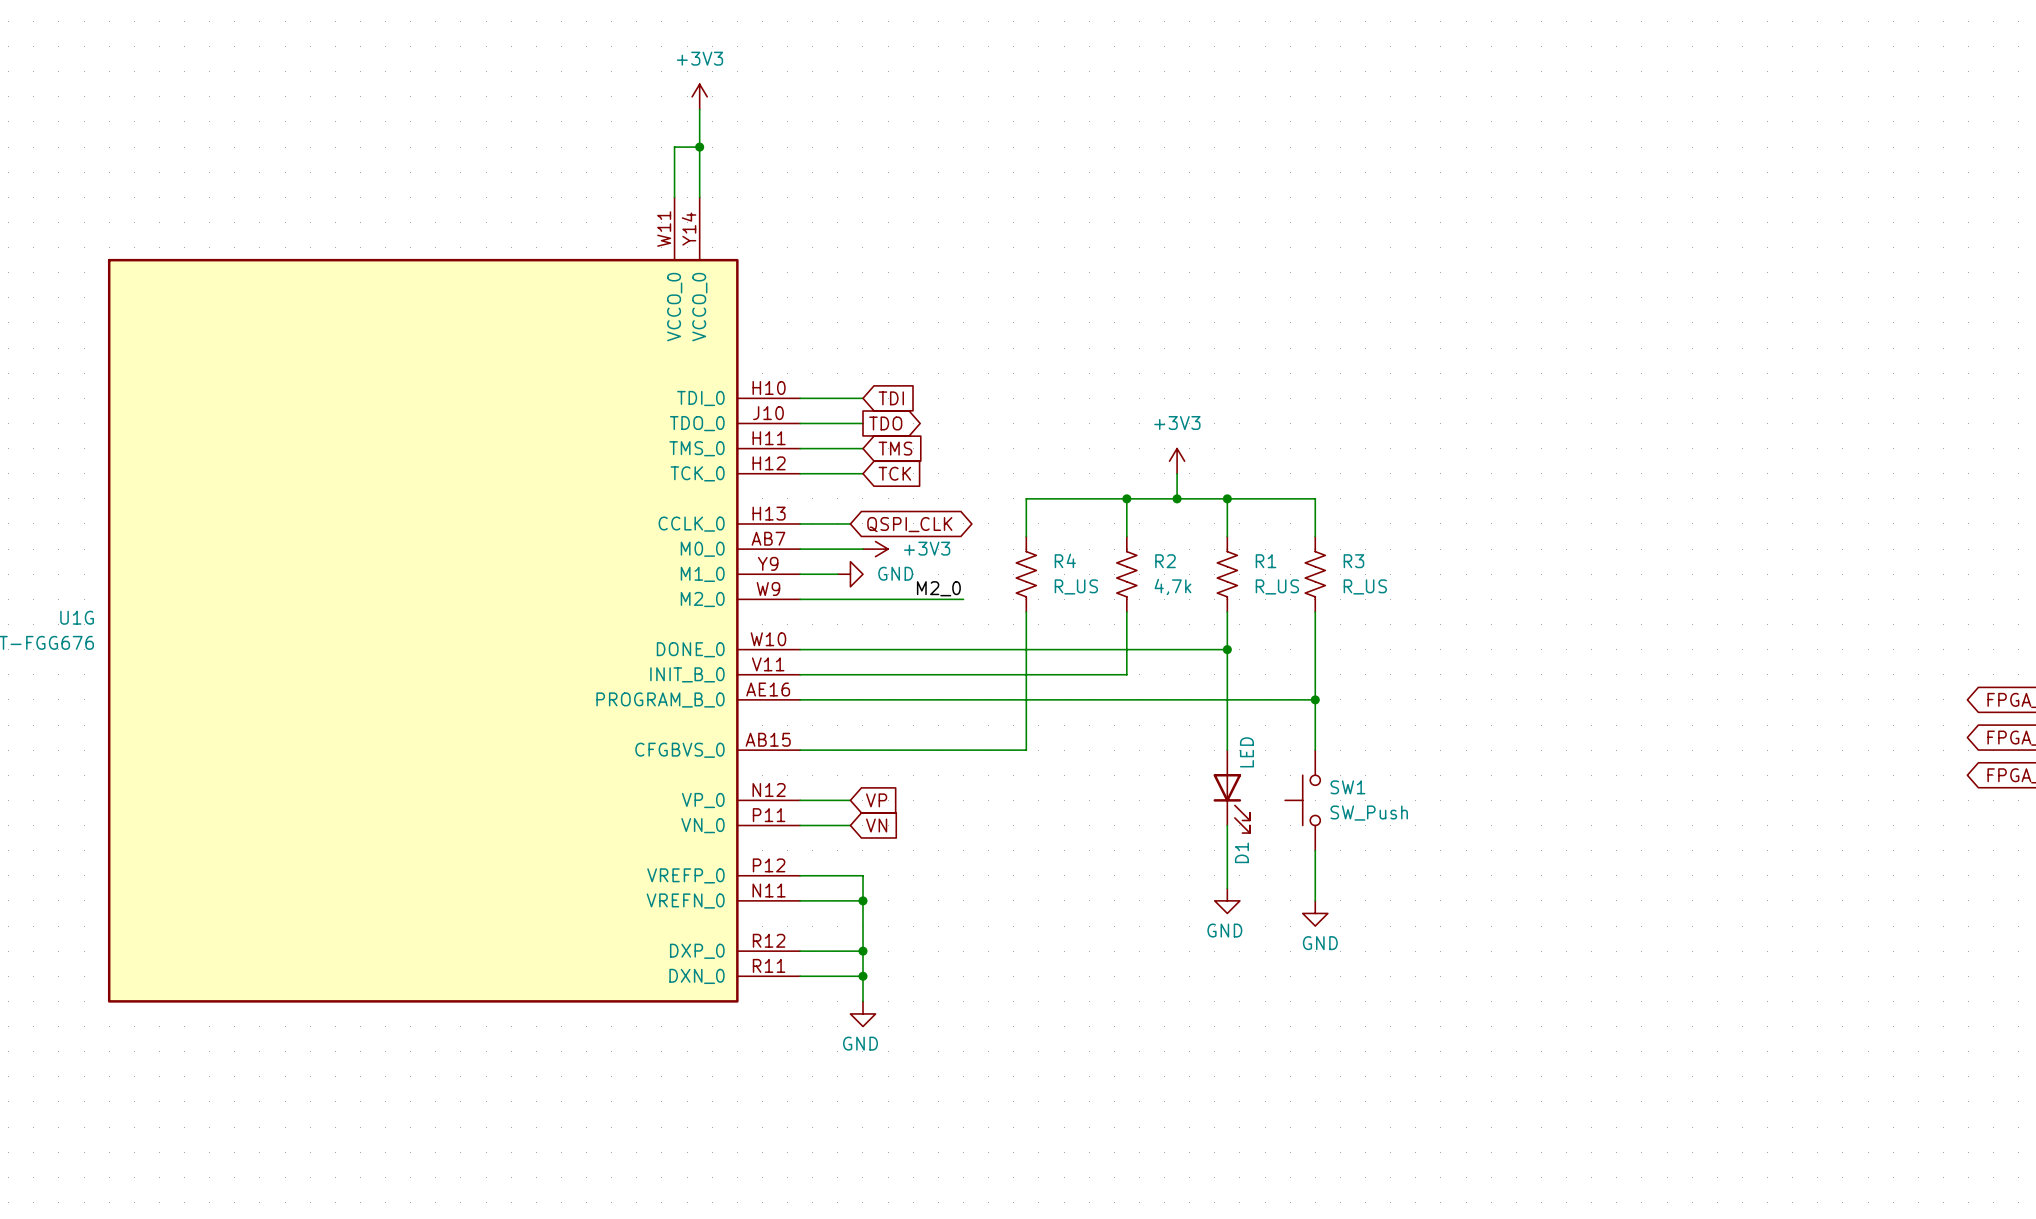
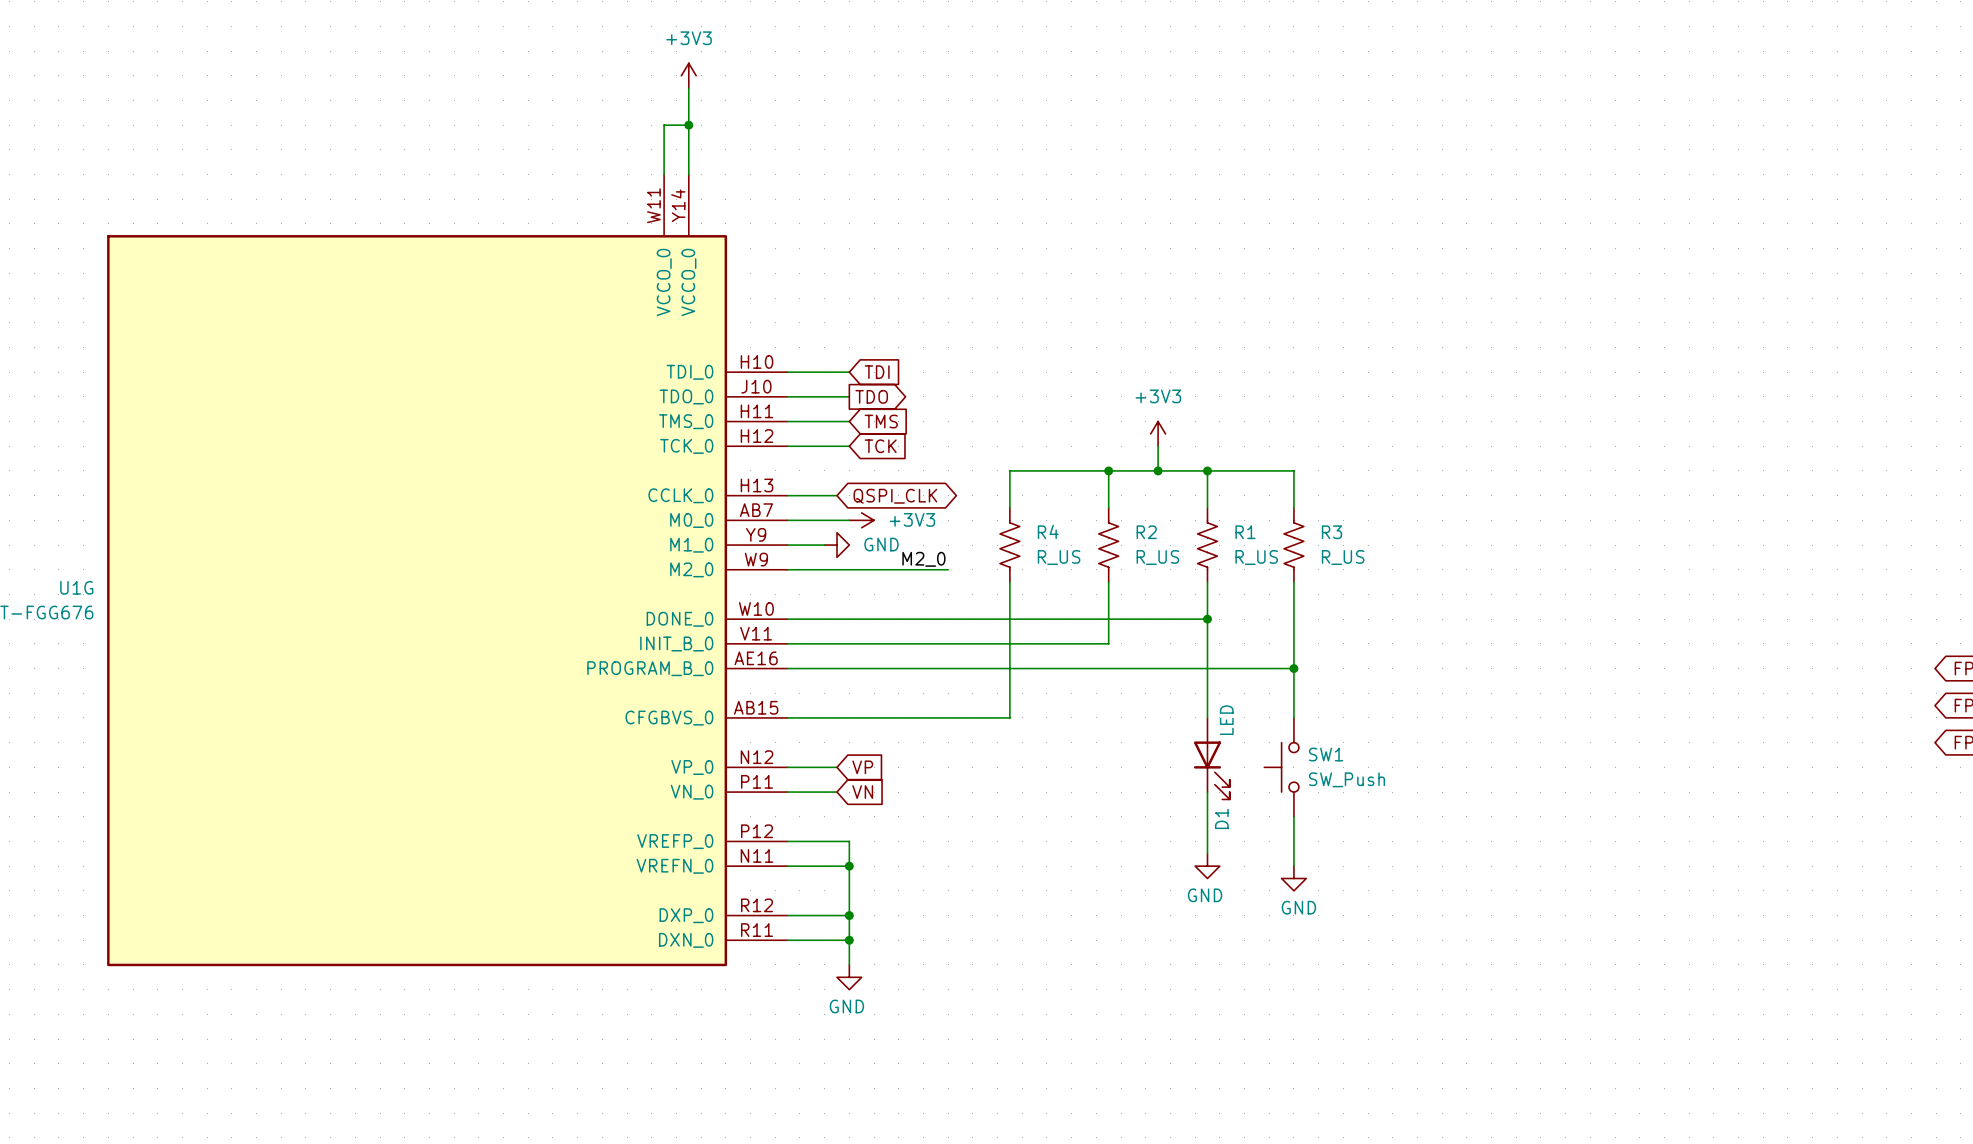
R2 value: 4,7k (1172, 586) -> R_US (1157, 557)

